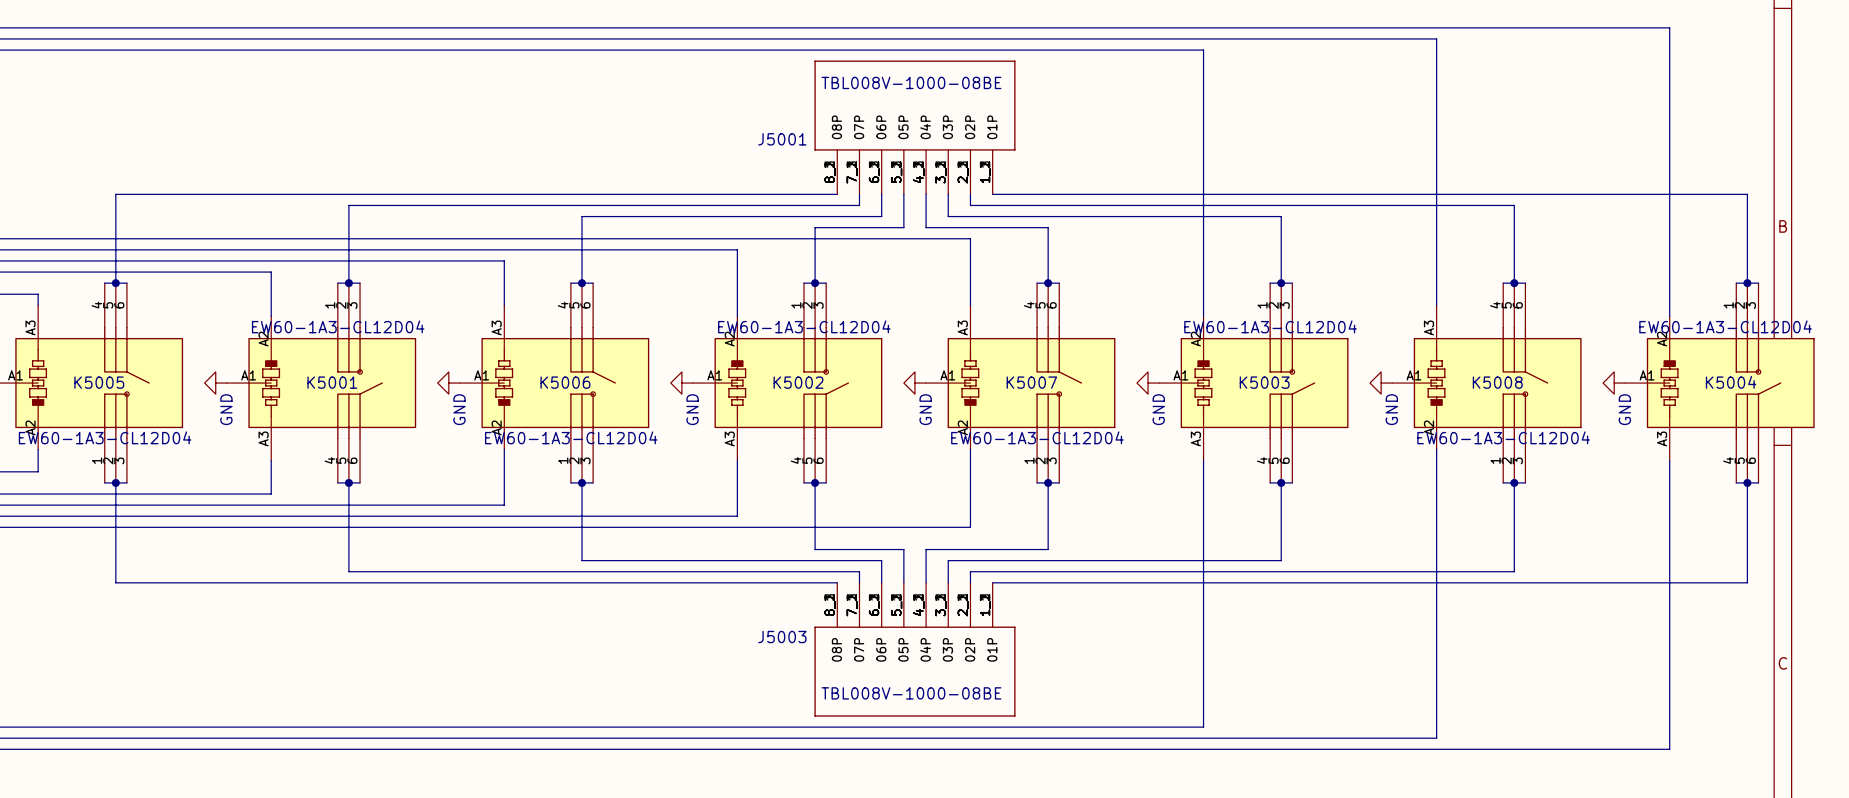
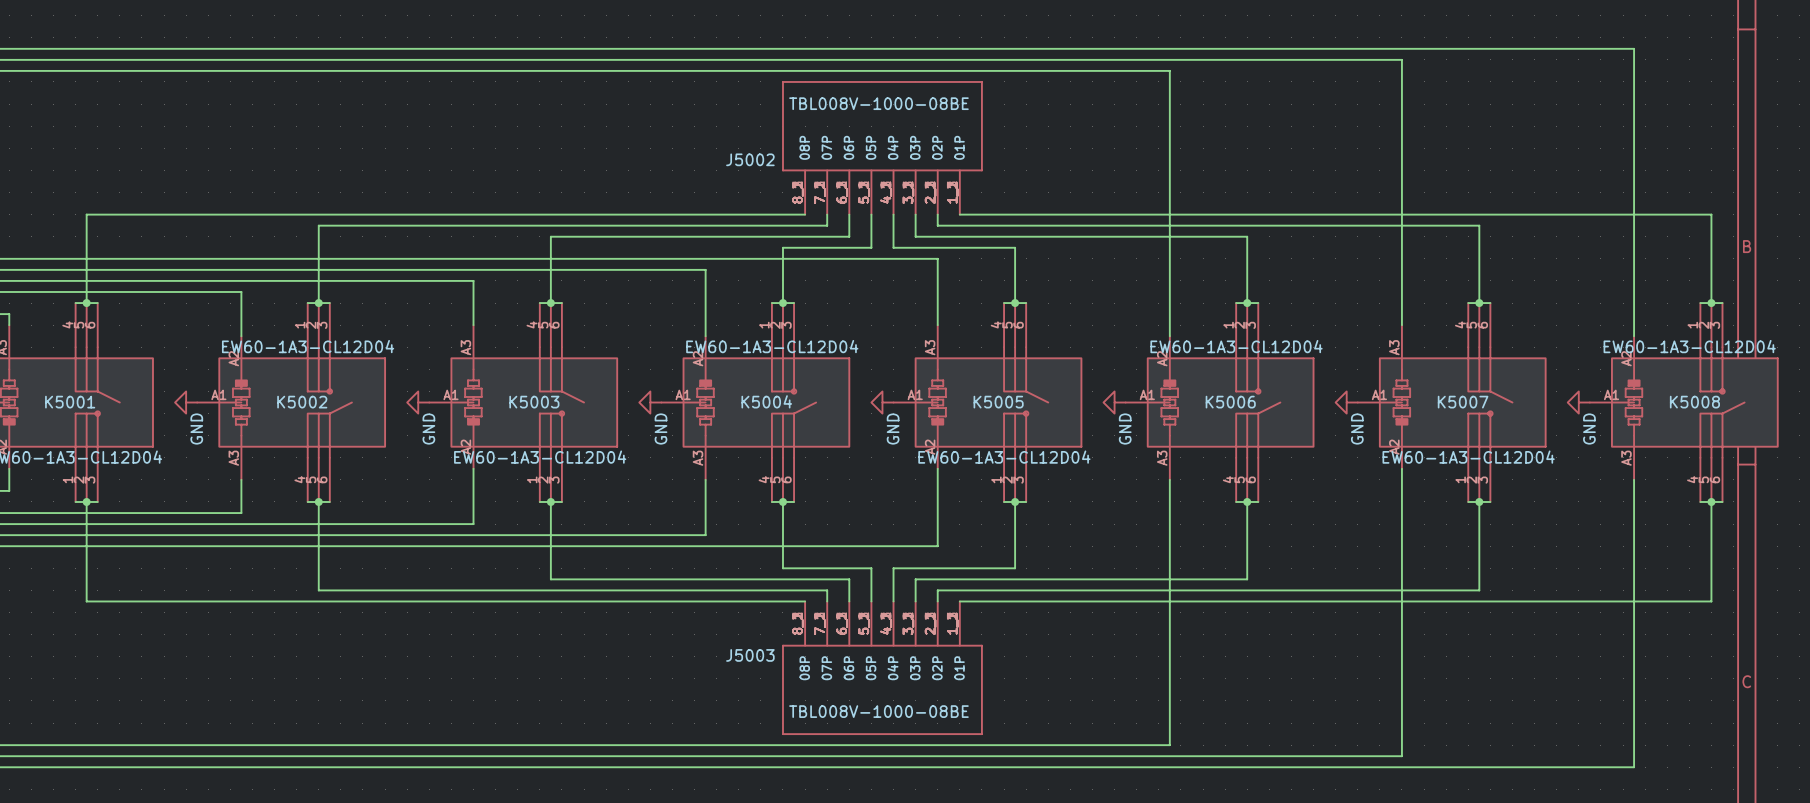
J5001 name: J5001 (782, 139) -> J5002 (750, 159)
K5005 name: K5005 (99, 382) -> K5001 (70, 402)
K5001 name: K5001 (332, 382) -> K5002 (302, 402)
K5006 name: K5006 (565, 382) -> K5003 (534, 402)
K5002 name: K5002 (798, 382) -> K5004 (766, 401)
K5007 name: K5007 (1031, 382) -> K5005 (998, 402)
K5003 name: K5003 (1264, 382) -> K5006 (1230, 402)
K5008 name: K5008 (1497, 382) -> K5007 (1463, 402)
K5004 name: K5004 (1731, 382) -> K5008 (1694, 402)

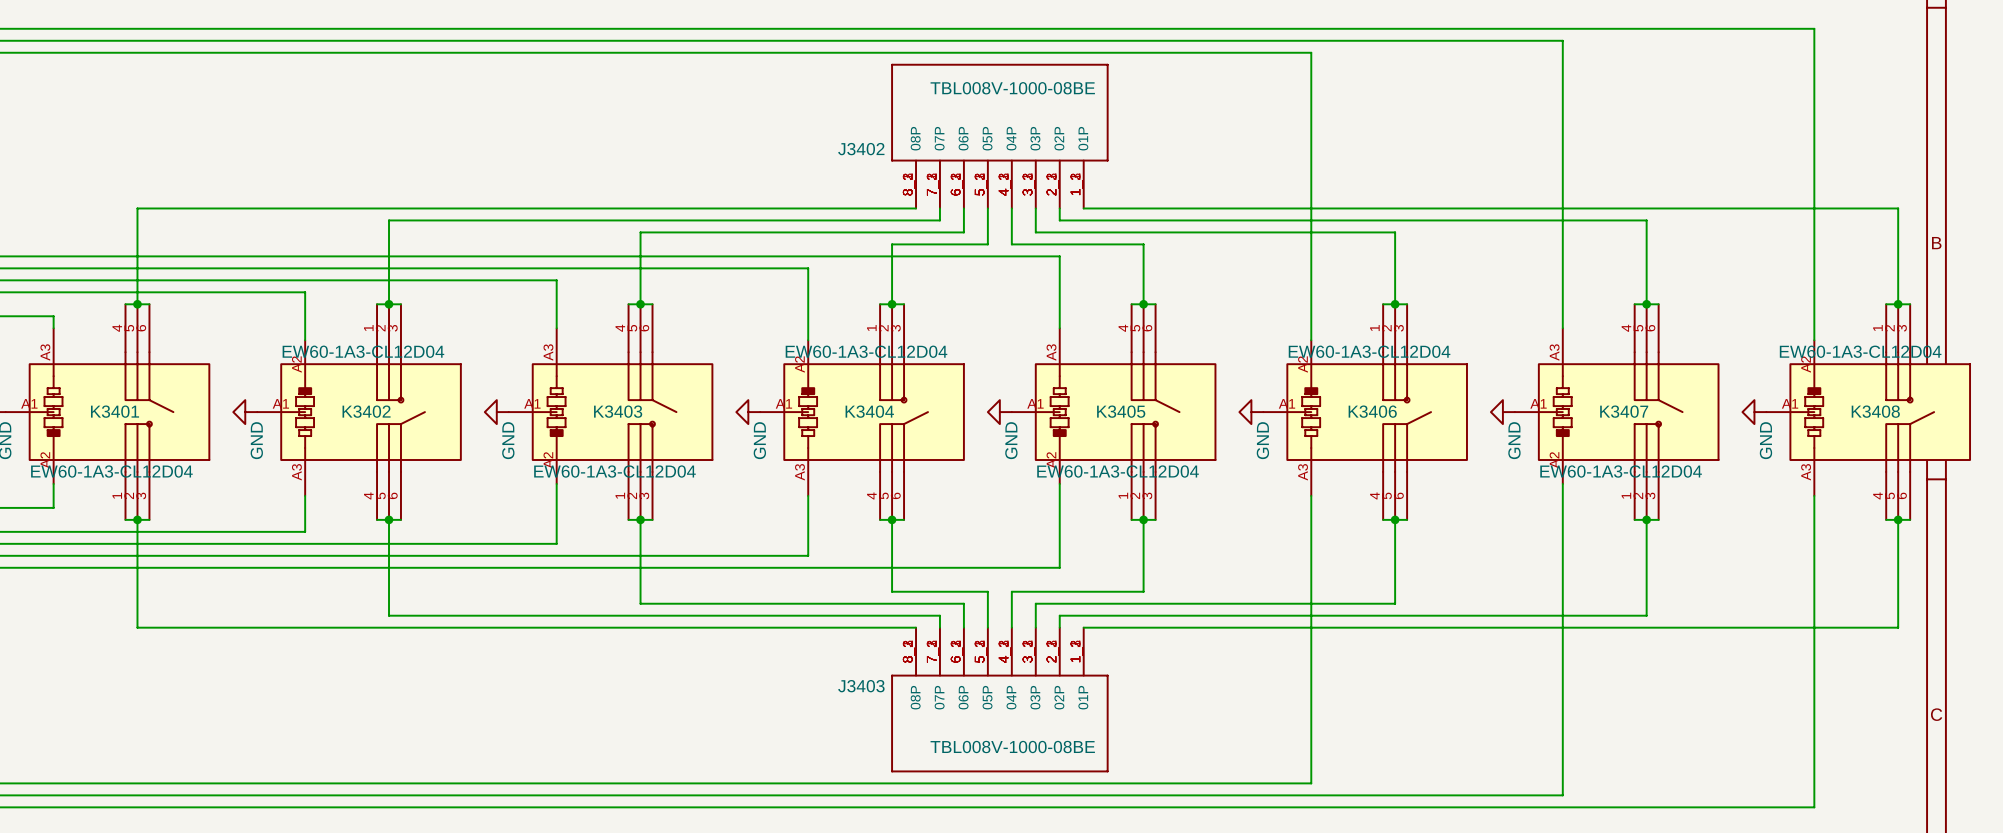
J5002 name: J5002 (750, 159) -> J3402 (861, 149)
K5004 name: K5004 (766, 401) -> K3404 (869, 411)
K5001 name: K5001 (70, 402) -> K3401 (115, 411)
K5002 name: K5002 (302, 402) -> K3402 (366, 411)
K5003 name: K5003 (534, 402) -> K3403 (618, 411)
K5005 name: K5005 (998, 402) -> K3405 (1121, 411)
K5006 name: K5006 (1230, 402) -> K3406 (1372, 411)
K5007 name: K5007 (1463, 402) -> K3407 (1624, 411)
K5008 name: K5008 (1694, 402) -> K3408 (1875, 411)
J5003 name: J5003 (750, 655) -> J3403 (861, 686)

